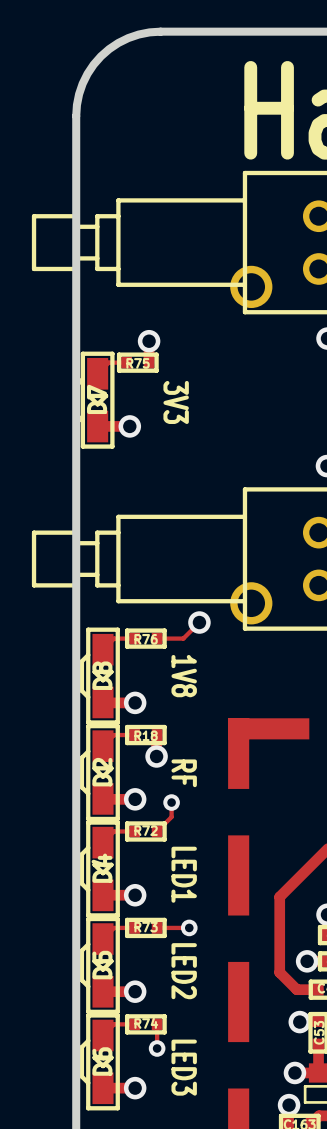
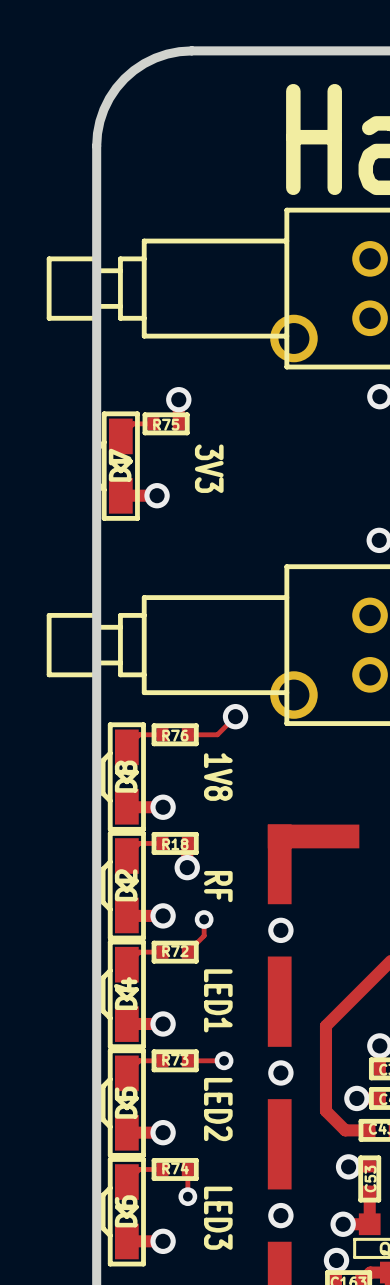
via: none -> (280, 930)
via: none -> (280, 1072)
via: none -> (280, 1215)

